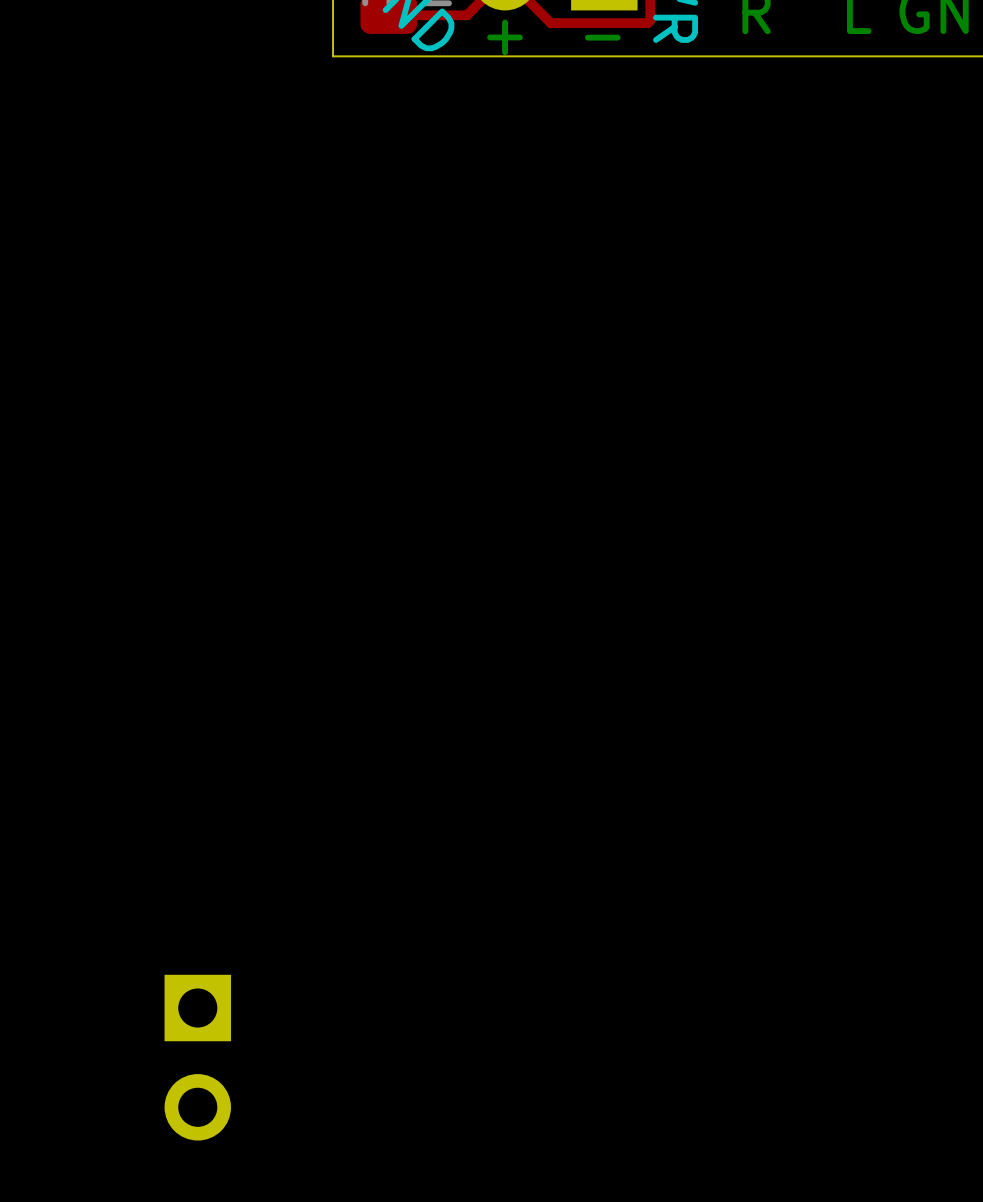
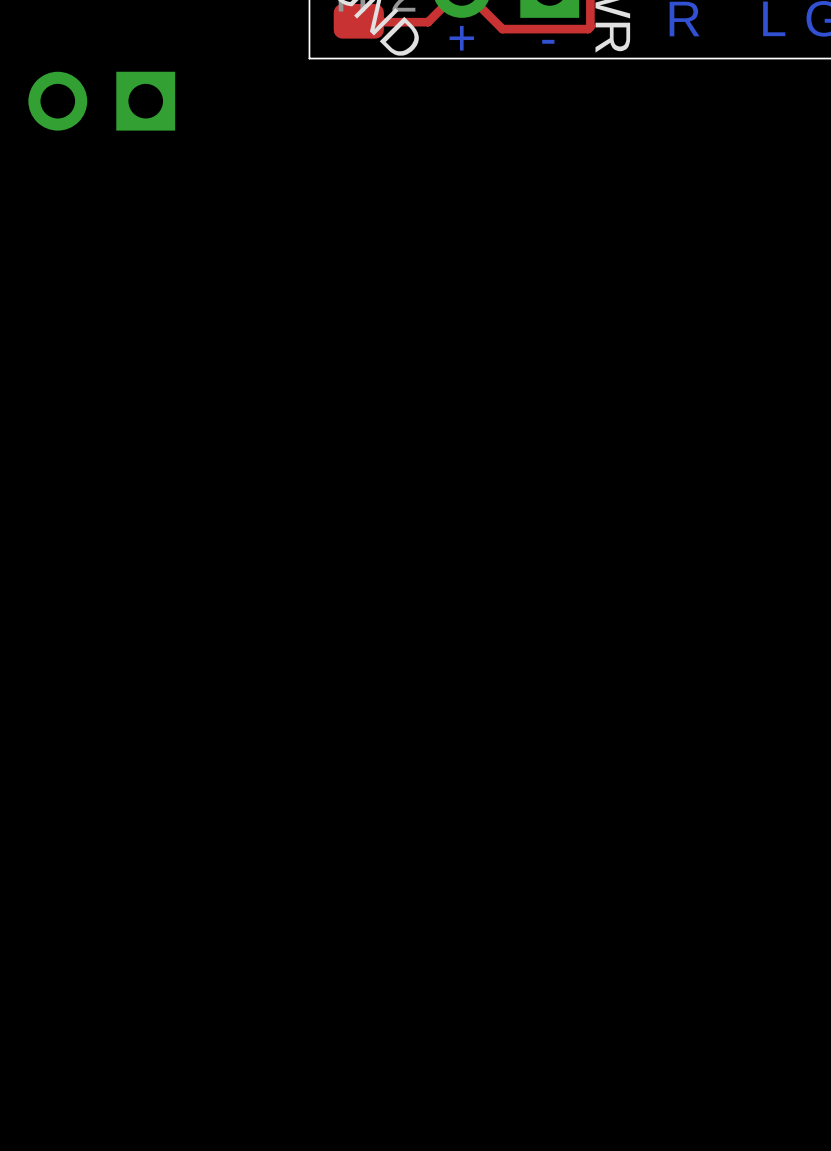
part rotation: 0° (197, 1057) -> 90° clockwise (101, 101)
part position: (197, 1057) -> (101, 101)

